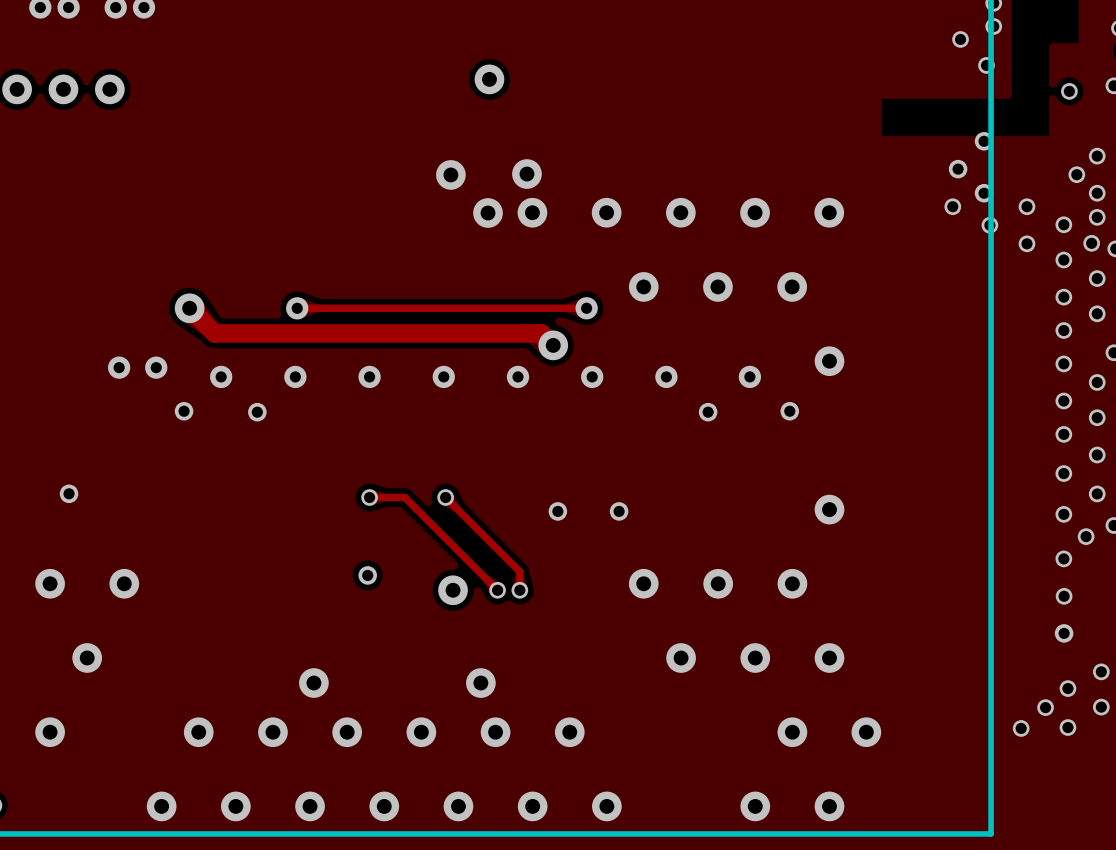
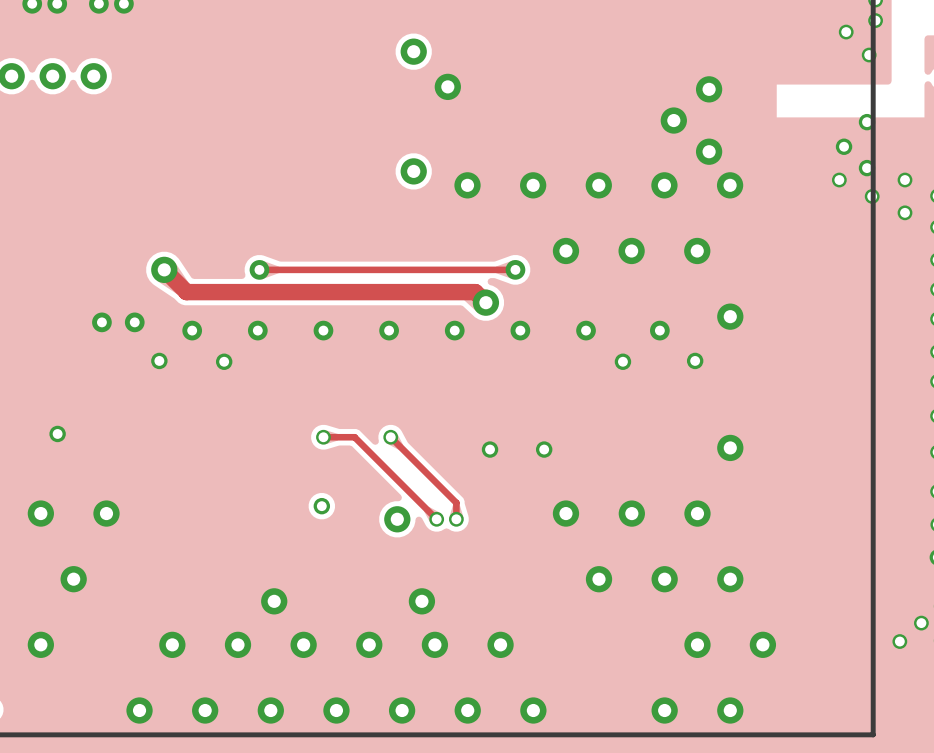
via: none -> (413, 51)
via: (489, 79) -> none
via: none -> (447, 86)
via: none -> (709, 89)
via: none -> (673, 120)
via: (450, 174) -> none
via: (526, 174) -> none
via: none -> (709, 151)
via: none -> (413, 171)
via: (488, 212) -> none

